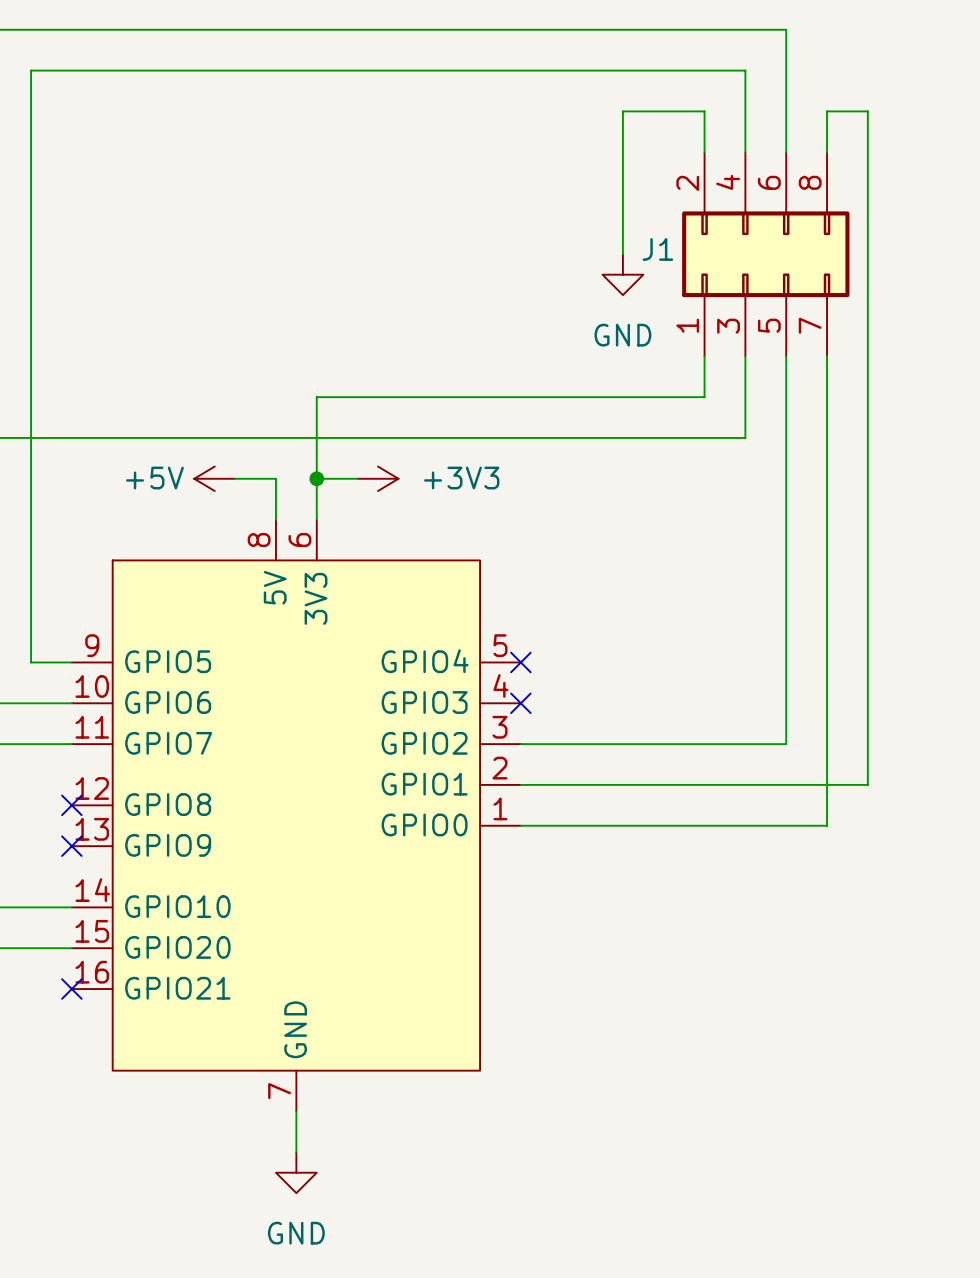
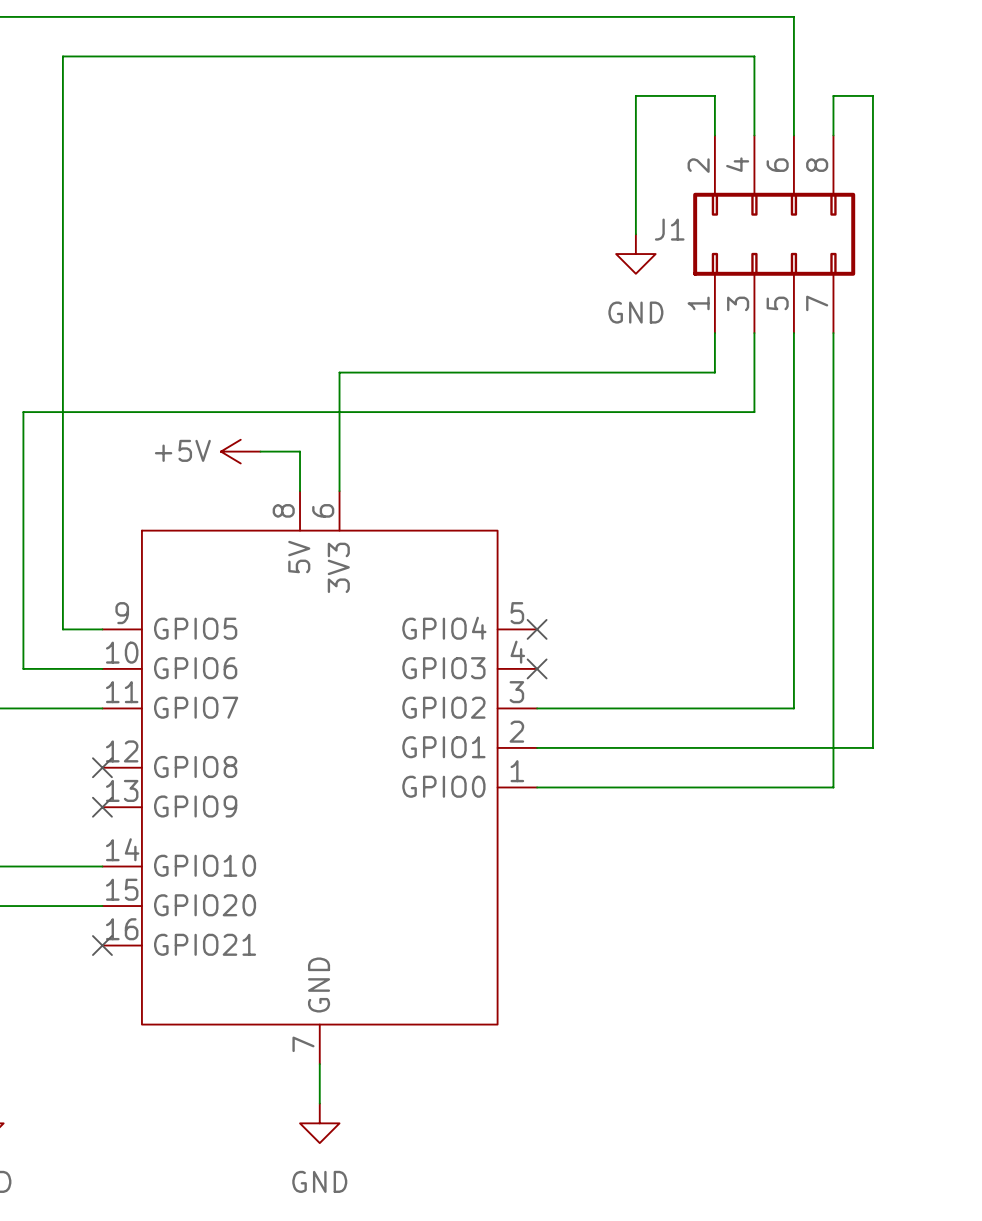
wire: (316, 478) (357, 478) -> none
junction: (316, 478) -> none
power symbol: +3V3 (378, 478) -> none

